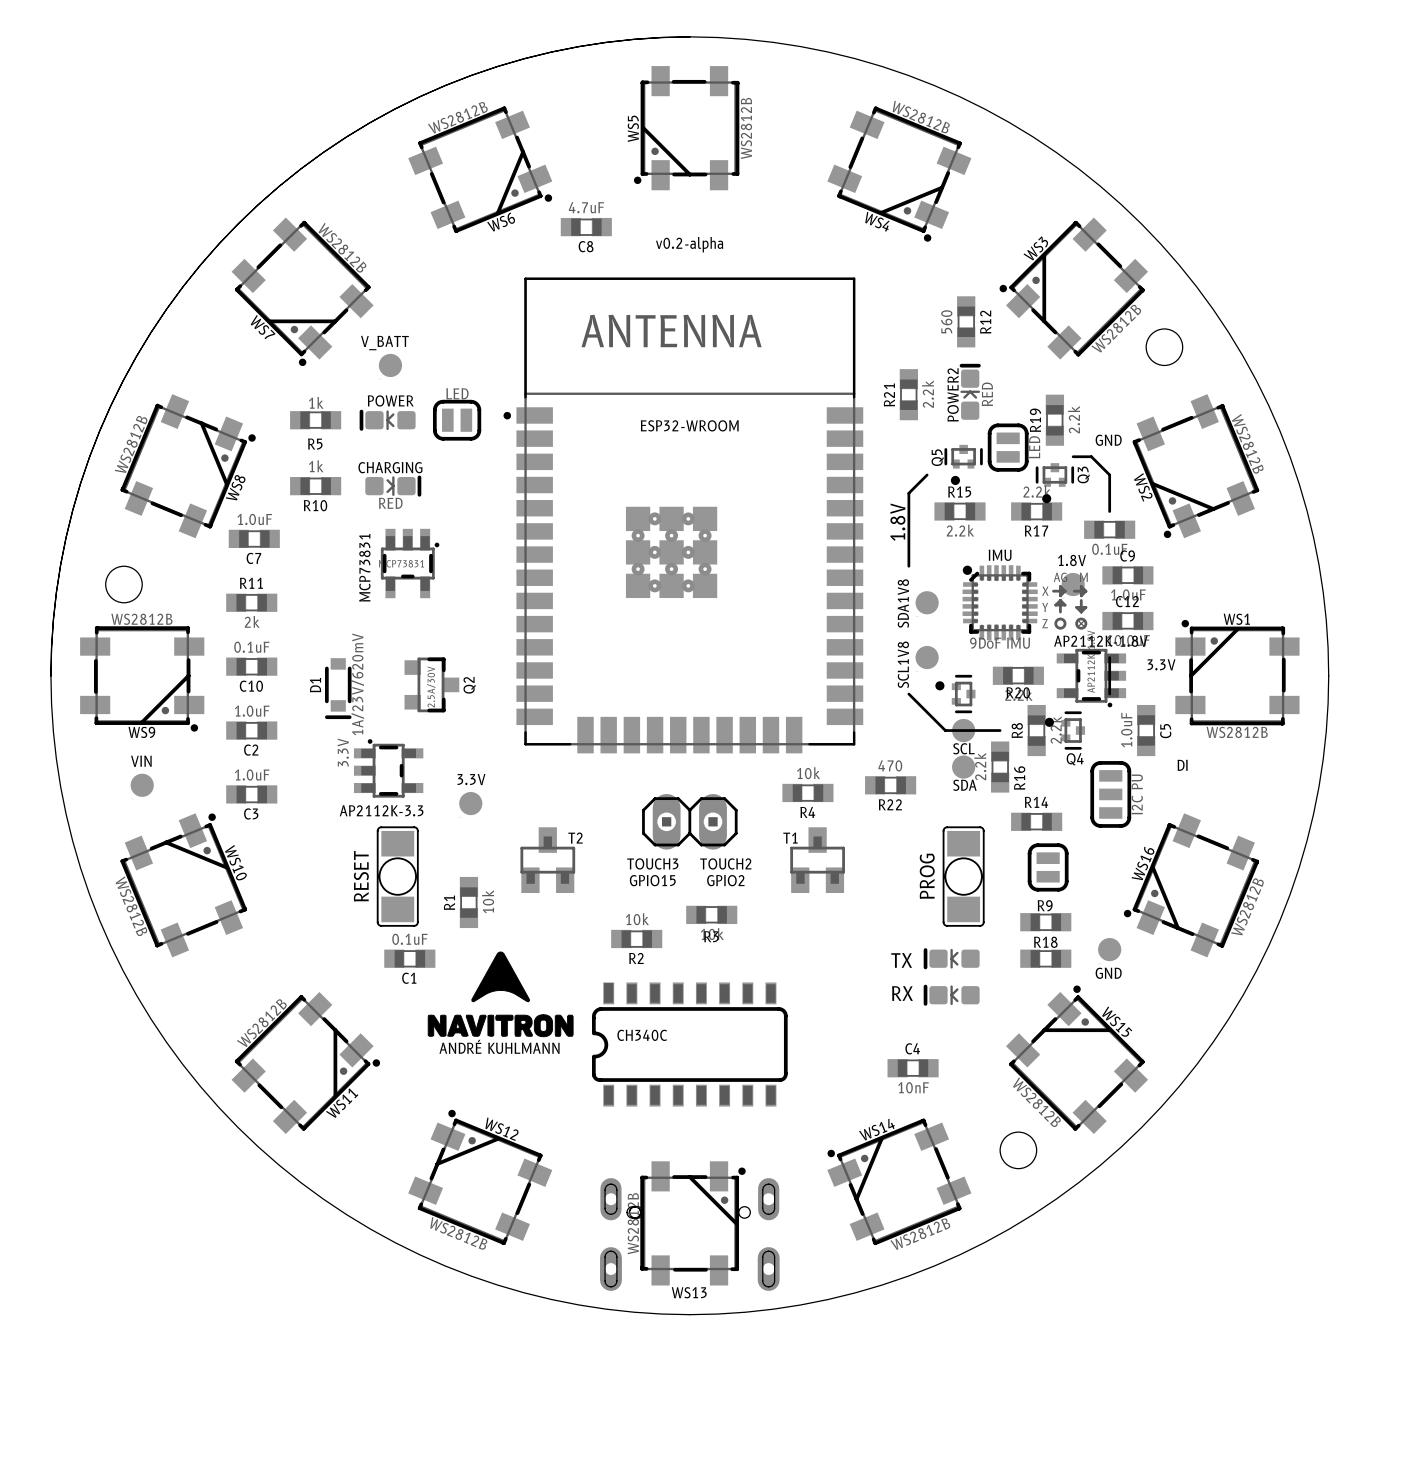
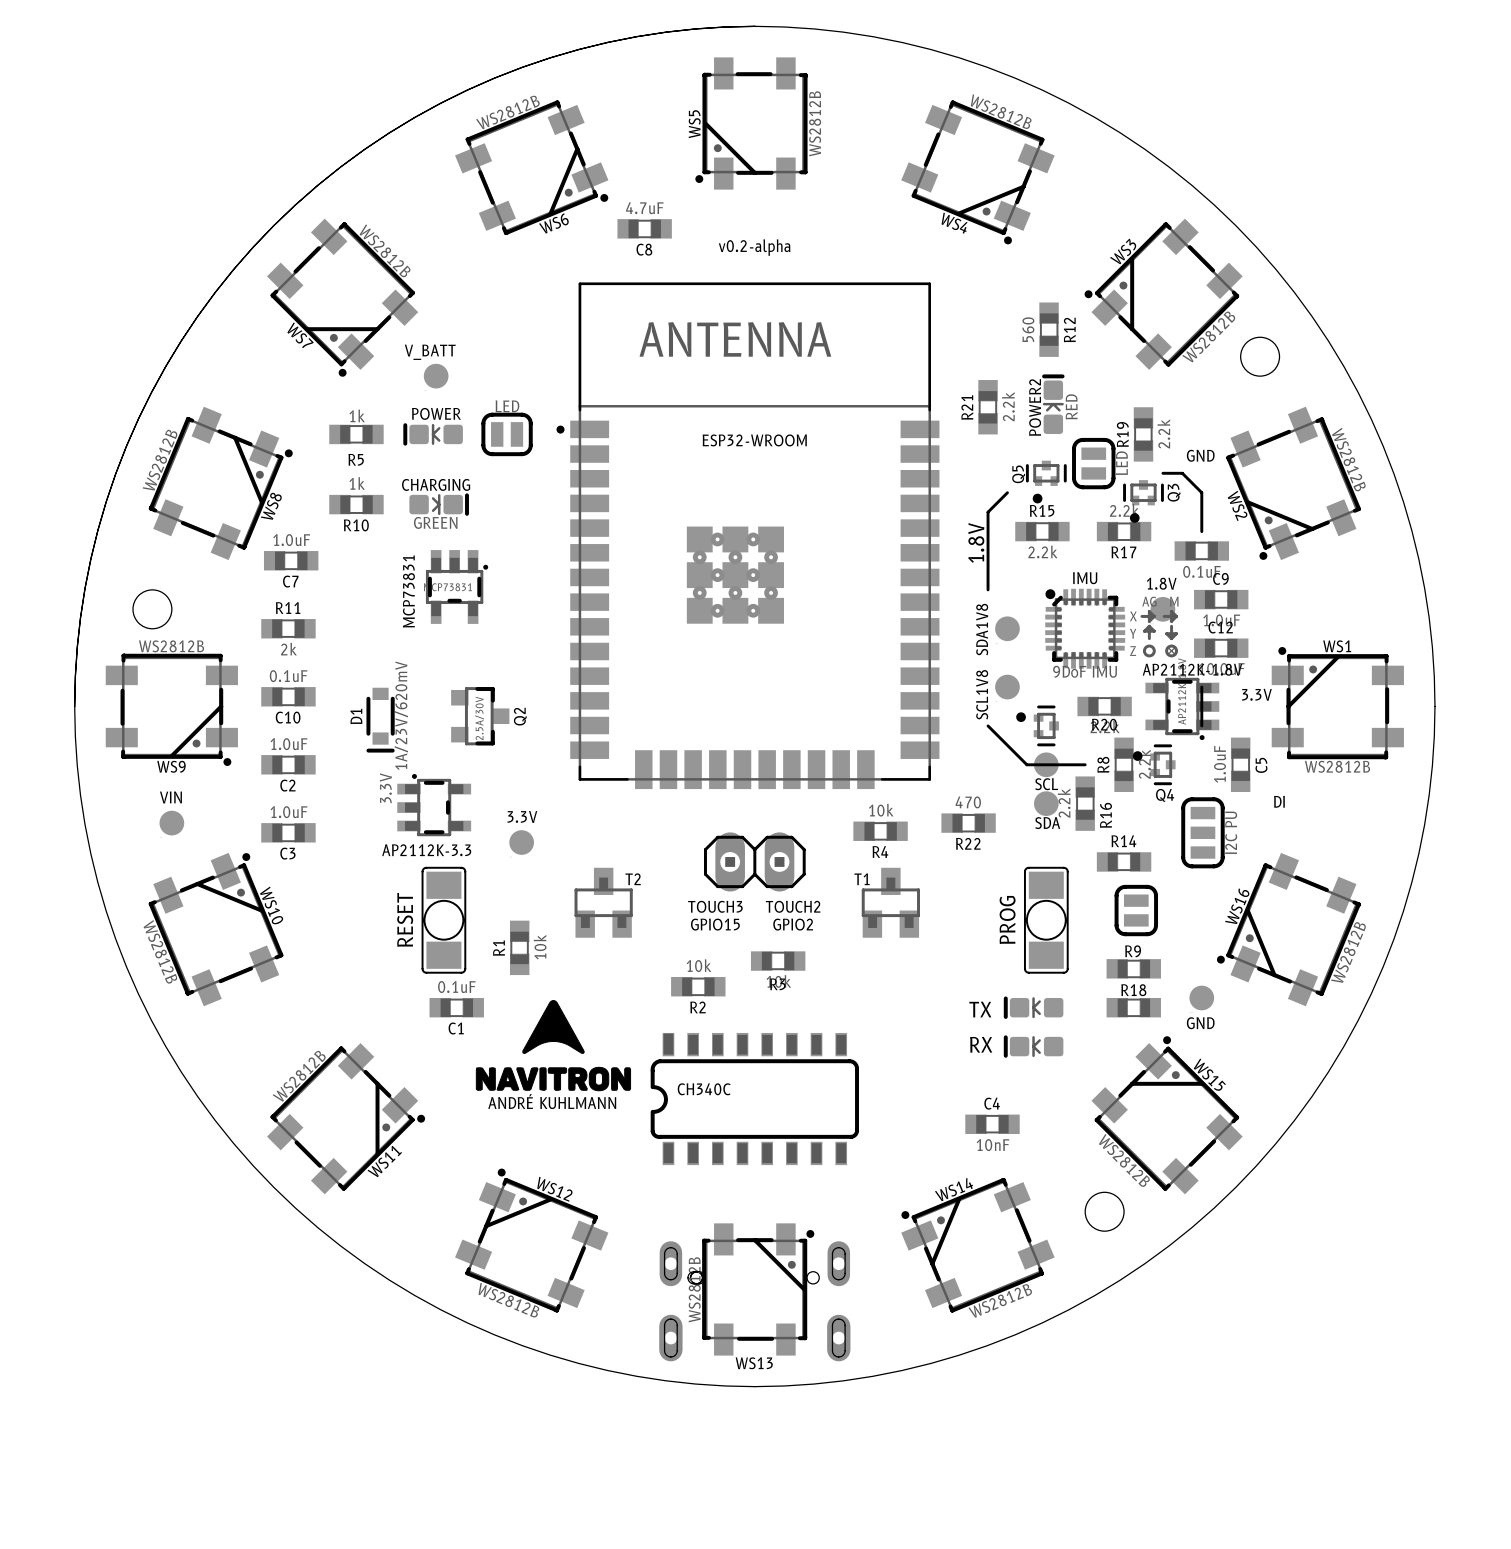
CHARGING value: RED (390, 503) -> GREEN (435, 522)

